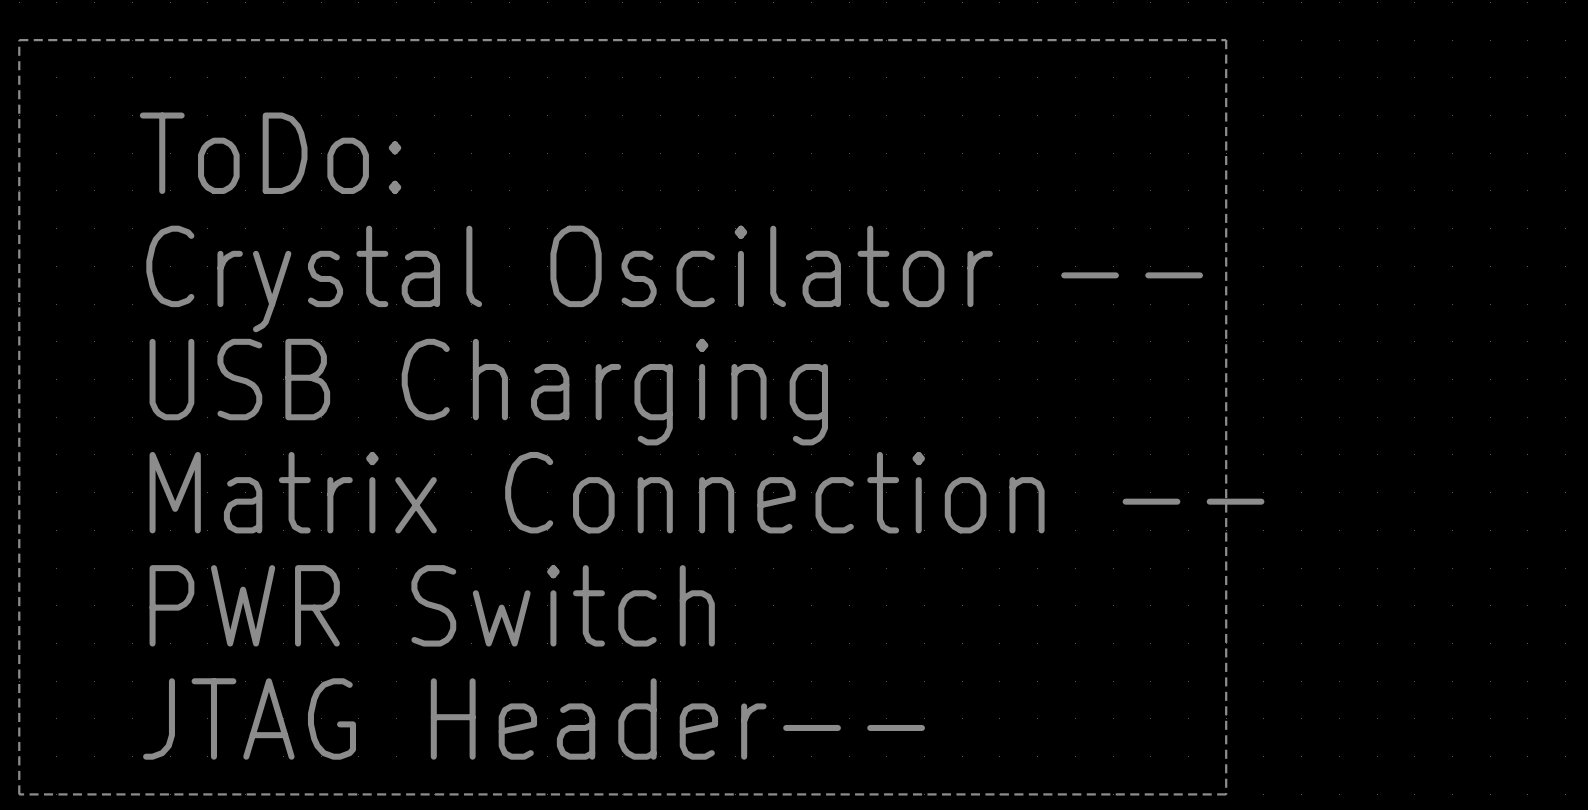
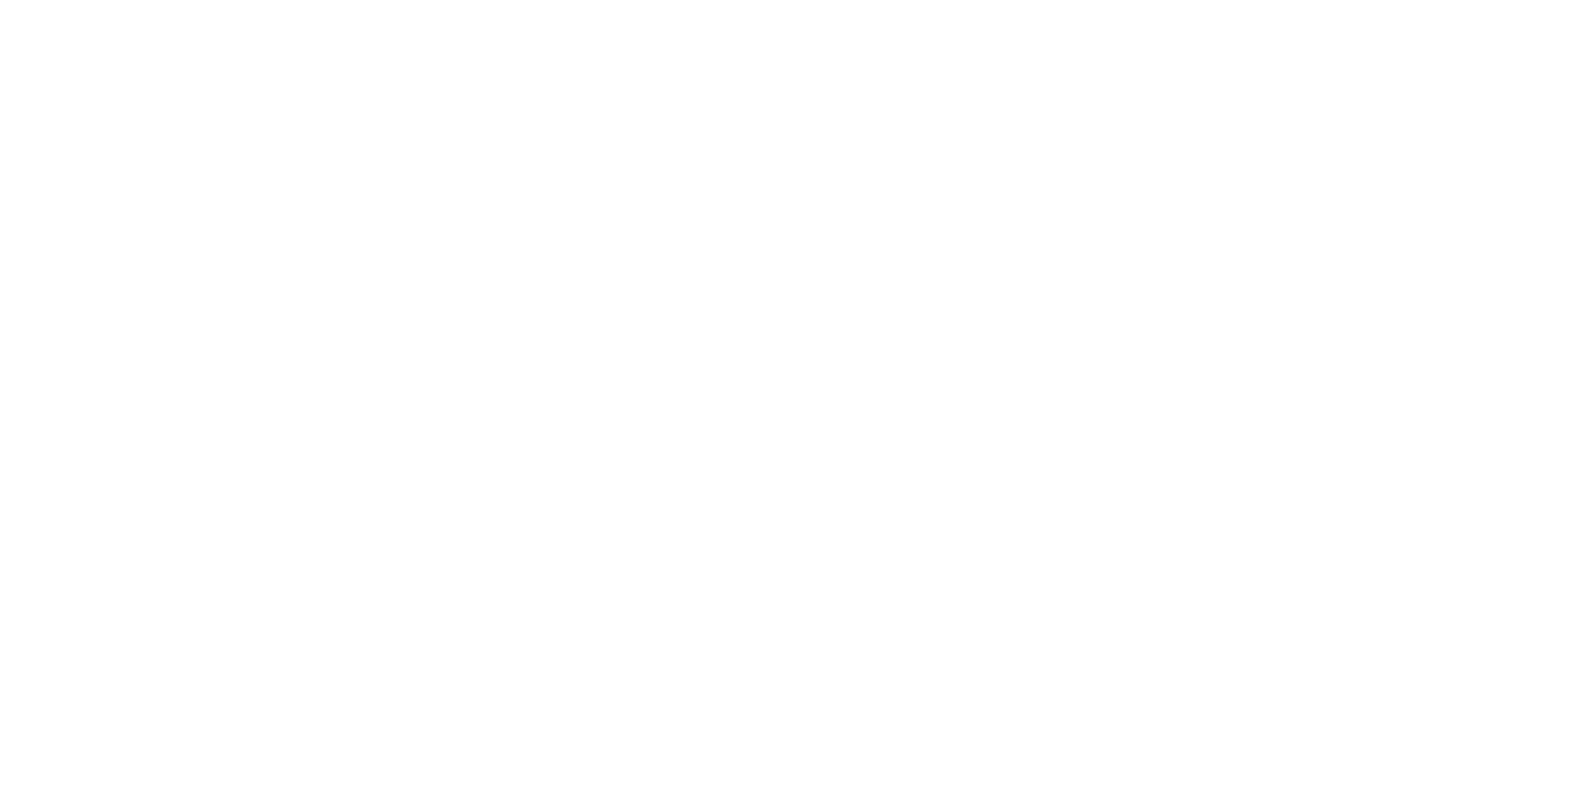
line: (19, 40) (1226, 40) (1226, 794) (19, 794) (19, 40) -> none
text: ToDo: (270, 153) -> none
text: Crystal Oscilator -- (674, 278) -> none
text: USB Charging (488, 392) -> none
text: Matrix Connection -- (706, 492) -> none
text: PWR Switch (432, 605) -> none
text: JTAG Header-- (534, 718) -> none

